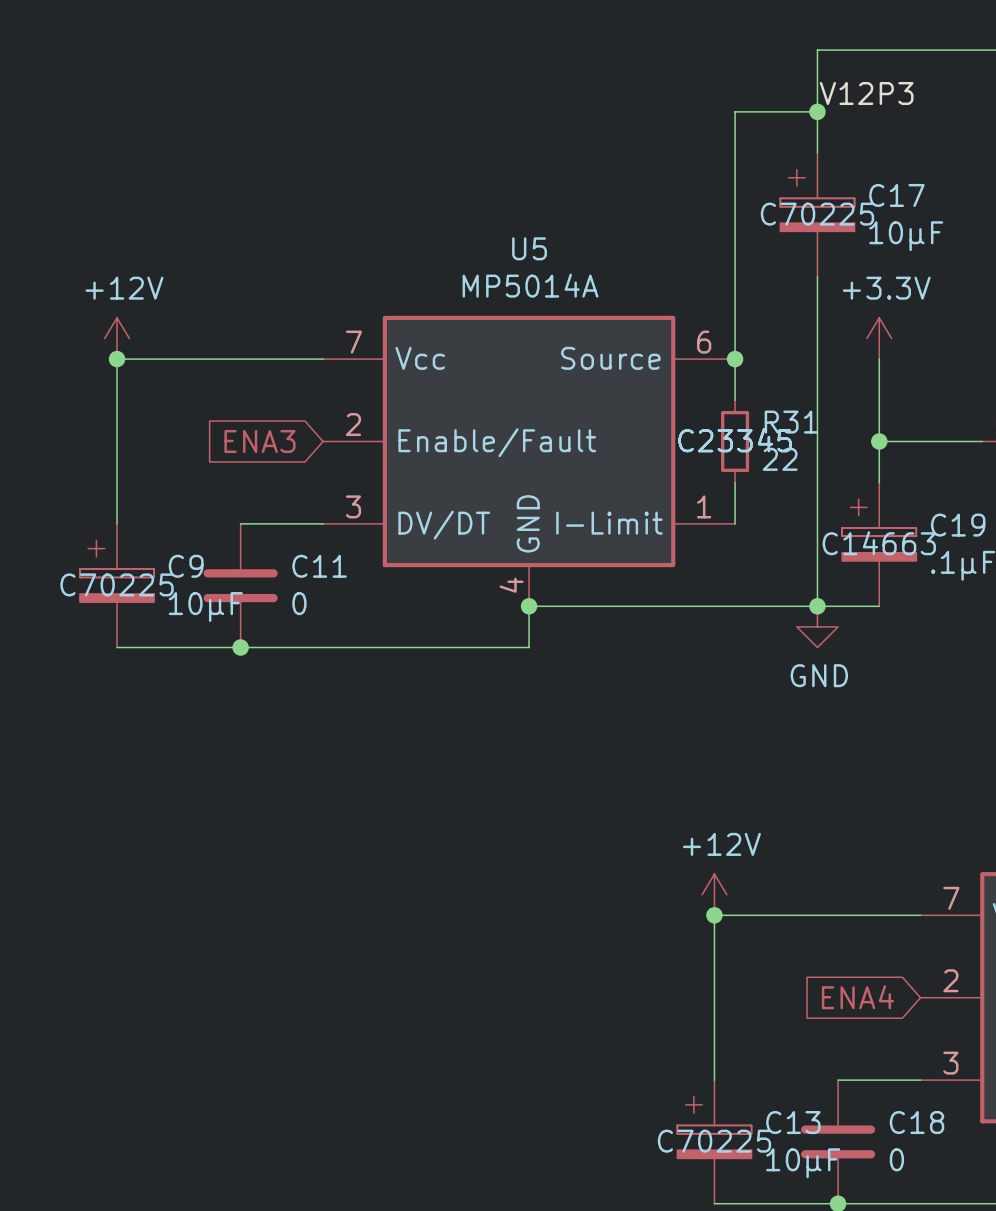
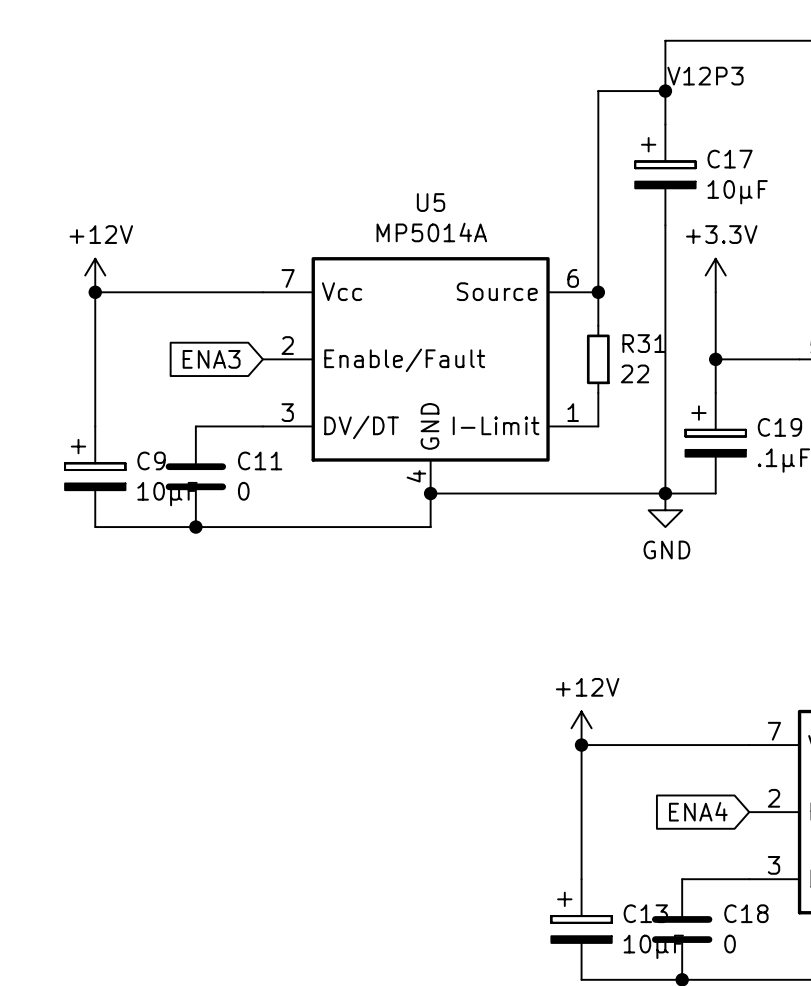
C17 text: C70225 (817, 214) -> none
R31 text: C23345 (735, 440) -> none
R31 text: C23345 (735, 440) -> none
C19 text: C14663 (879, 543) -> none
C9 text: C70225 (117, 584) -> none
C13 text: C70225 (714, 1141) -> none

